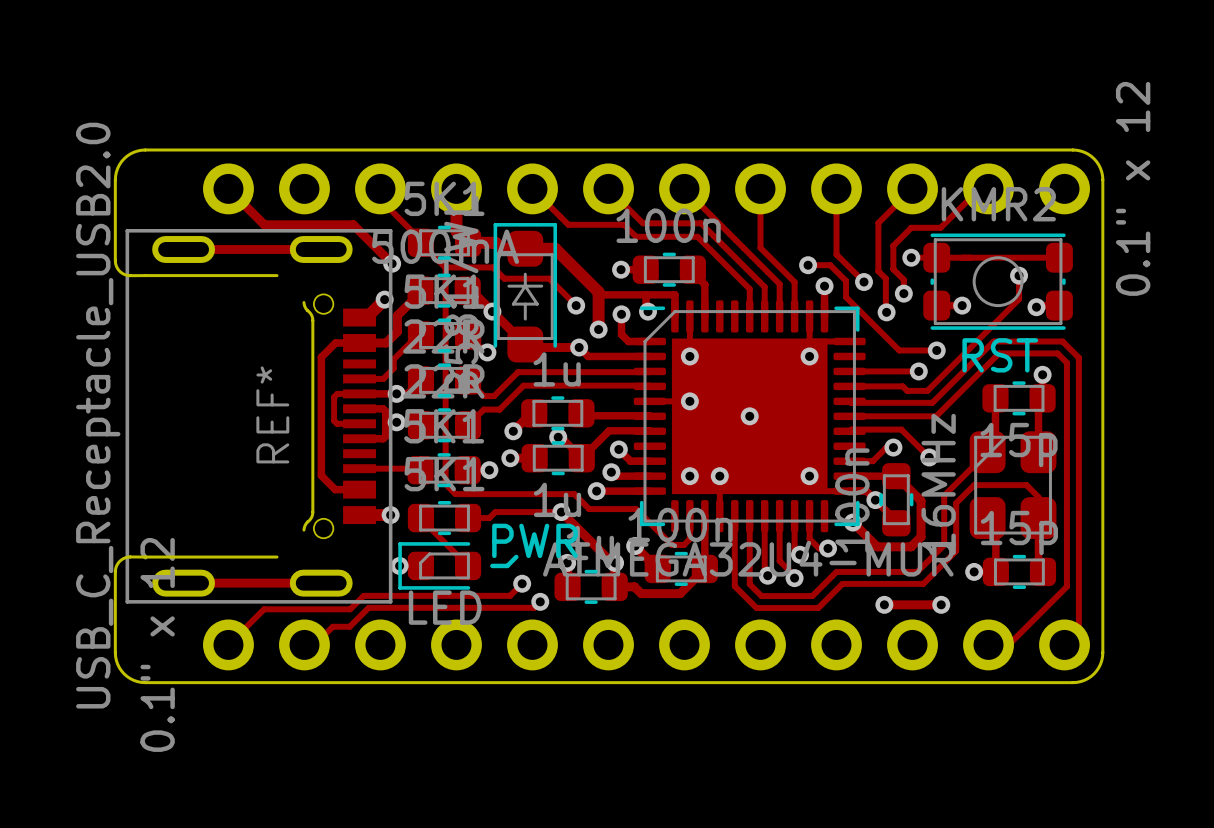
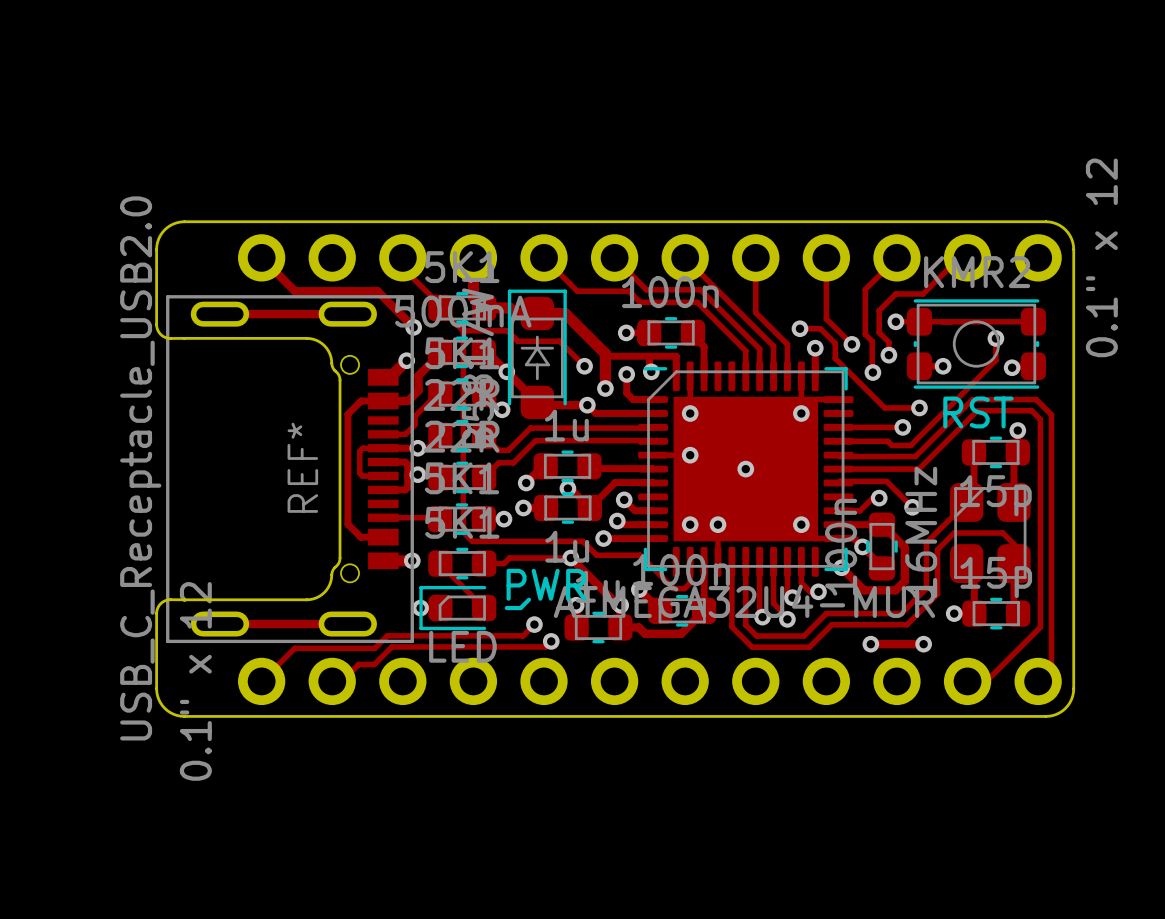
board edge: none -> (306, 338) (316, 340) (324, 345) (329, 353) (331, 363)
board edge: none -> (331, 574) (329, 584) (324, 592) (316, 597) (306, 599)

